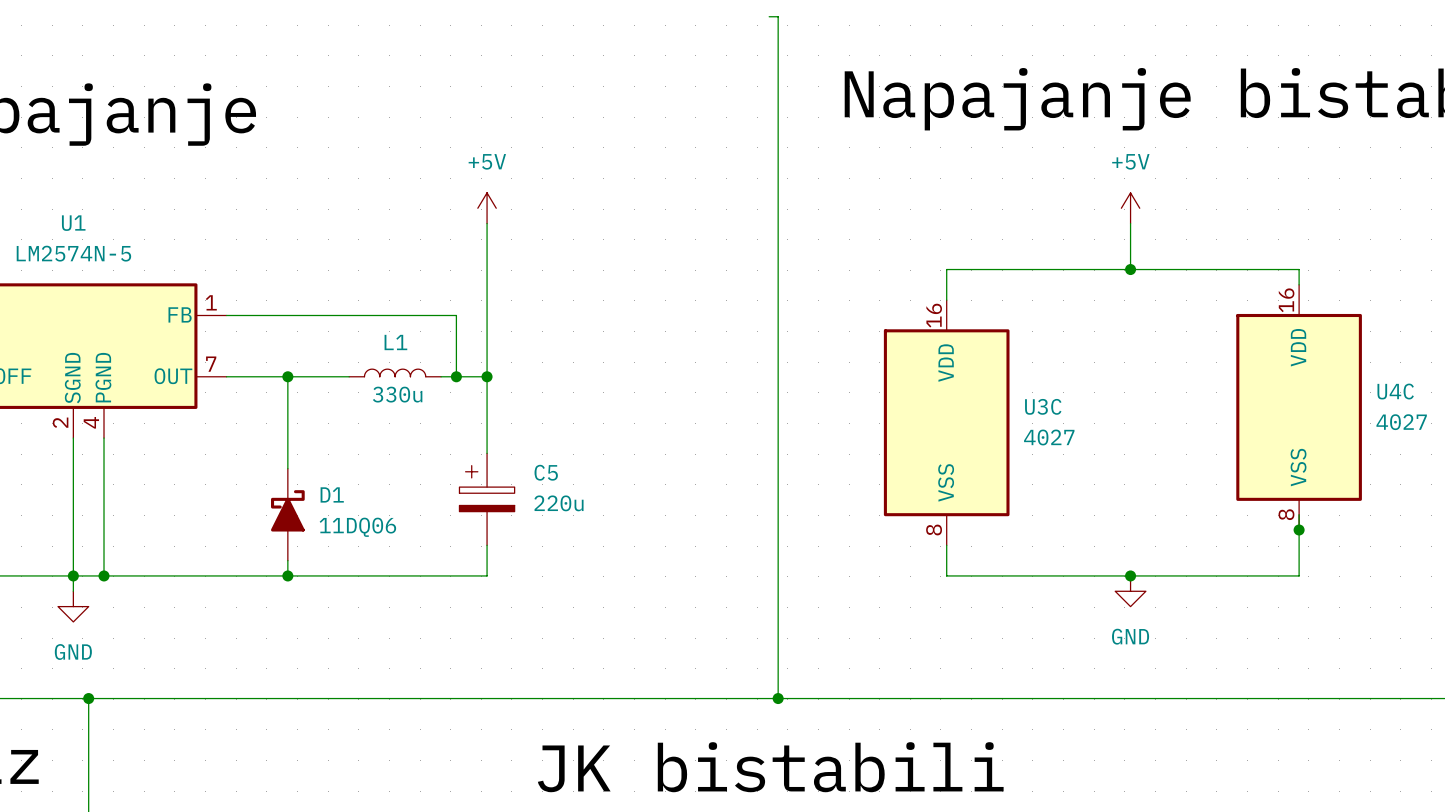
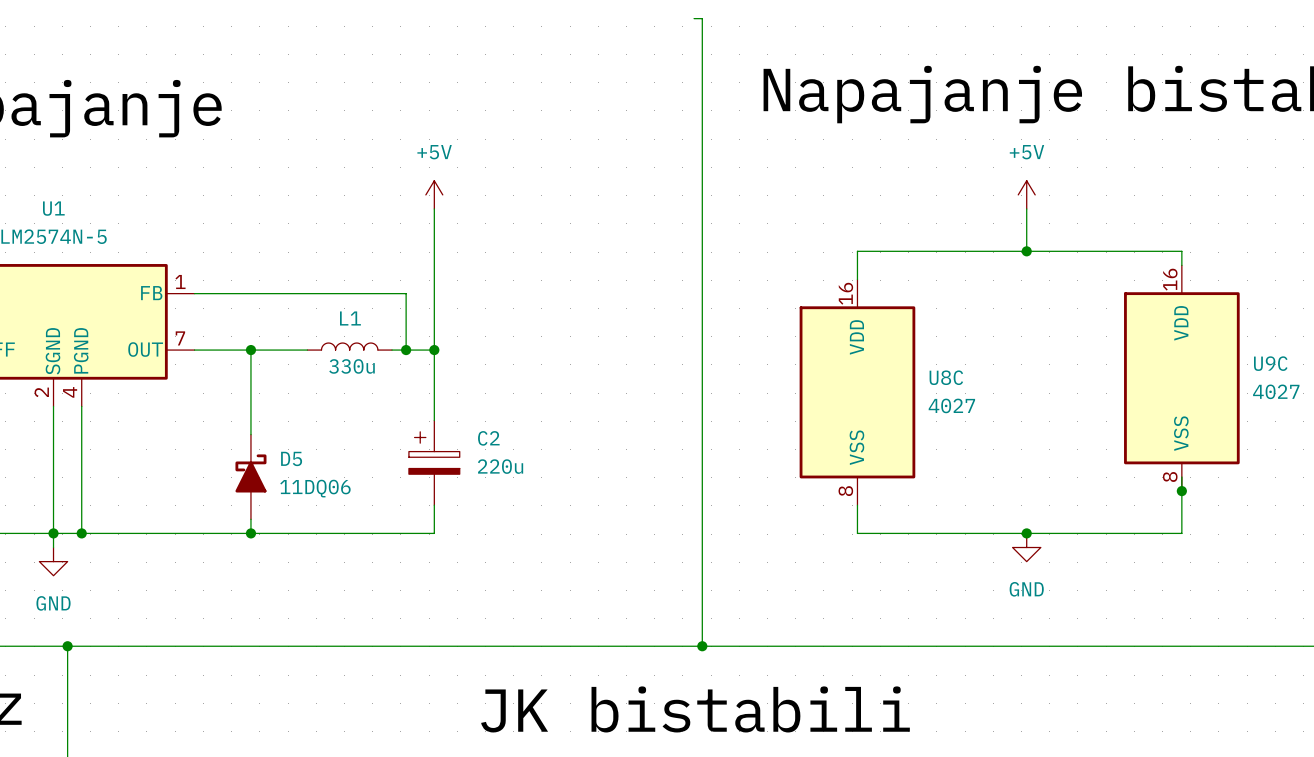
U4C name: U4C (1395, 391) -> U9C (1270, 363)
U3C name: U3C (1043, 406) -> U8C (946, 377)
C5 name: C5 (546, 472) -> C2 (488, 438)
D1 name: D1 (332, 494) -> D5 (291, 458)

